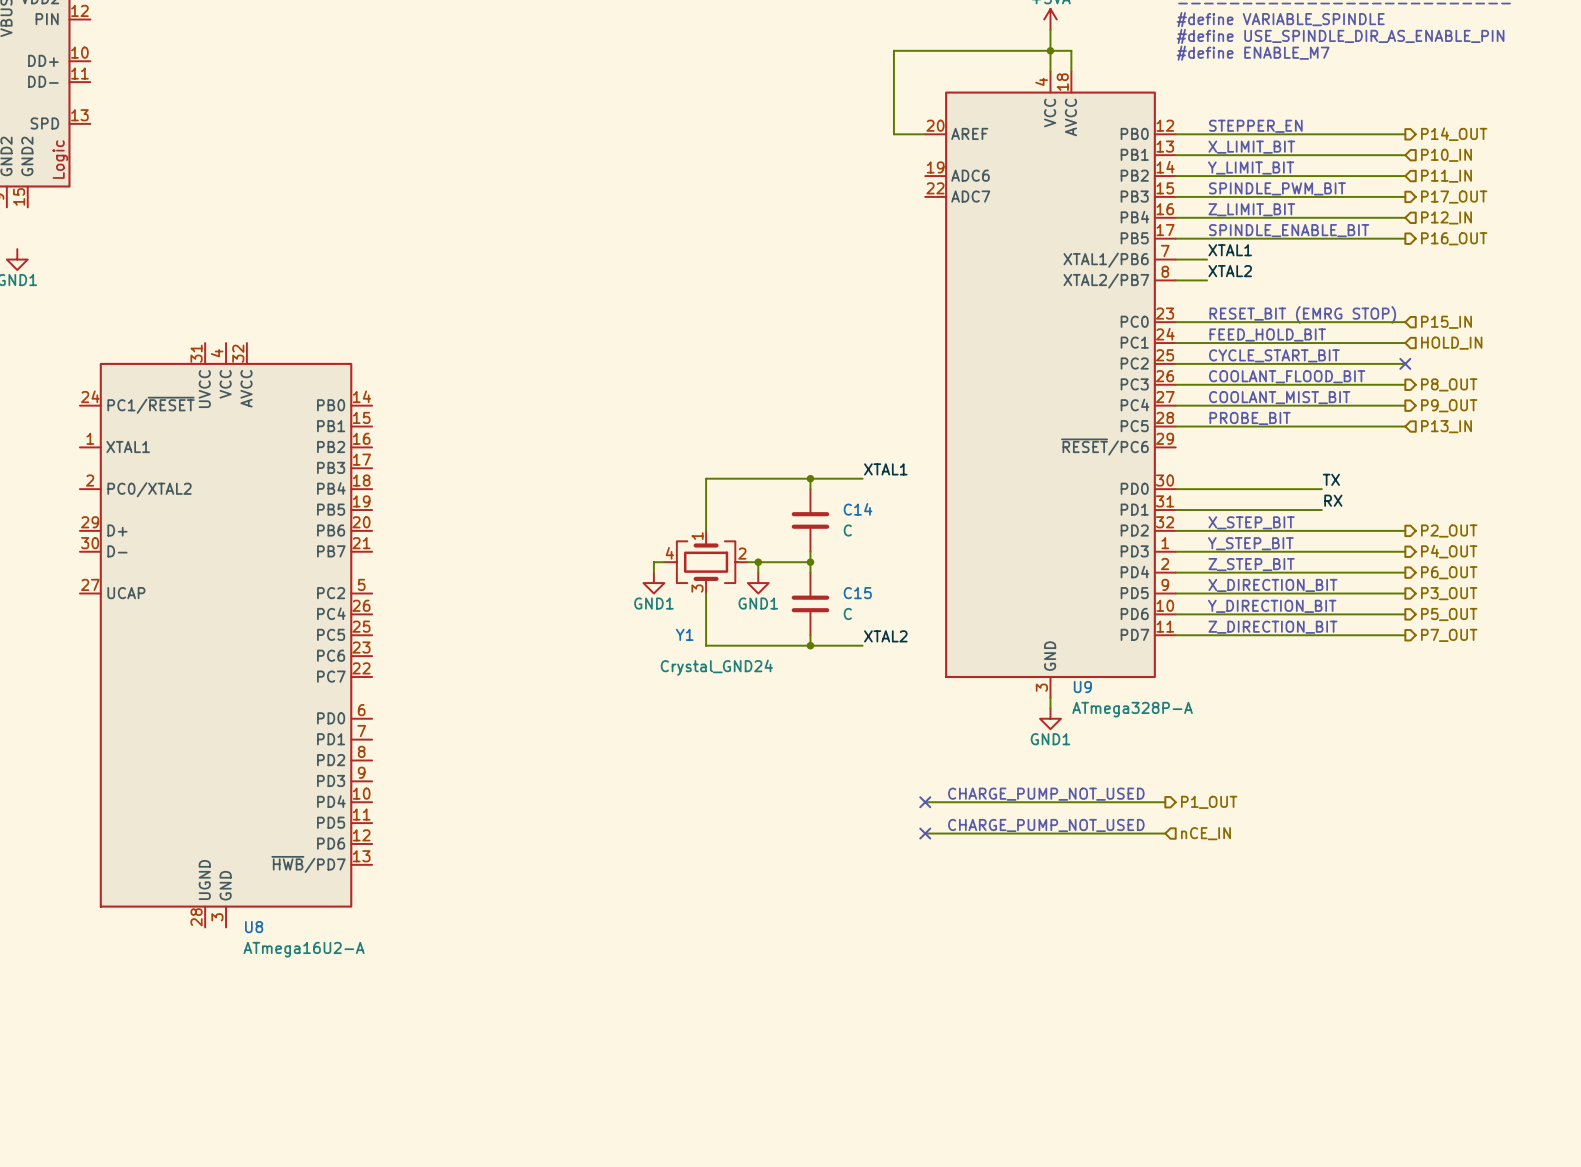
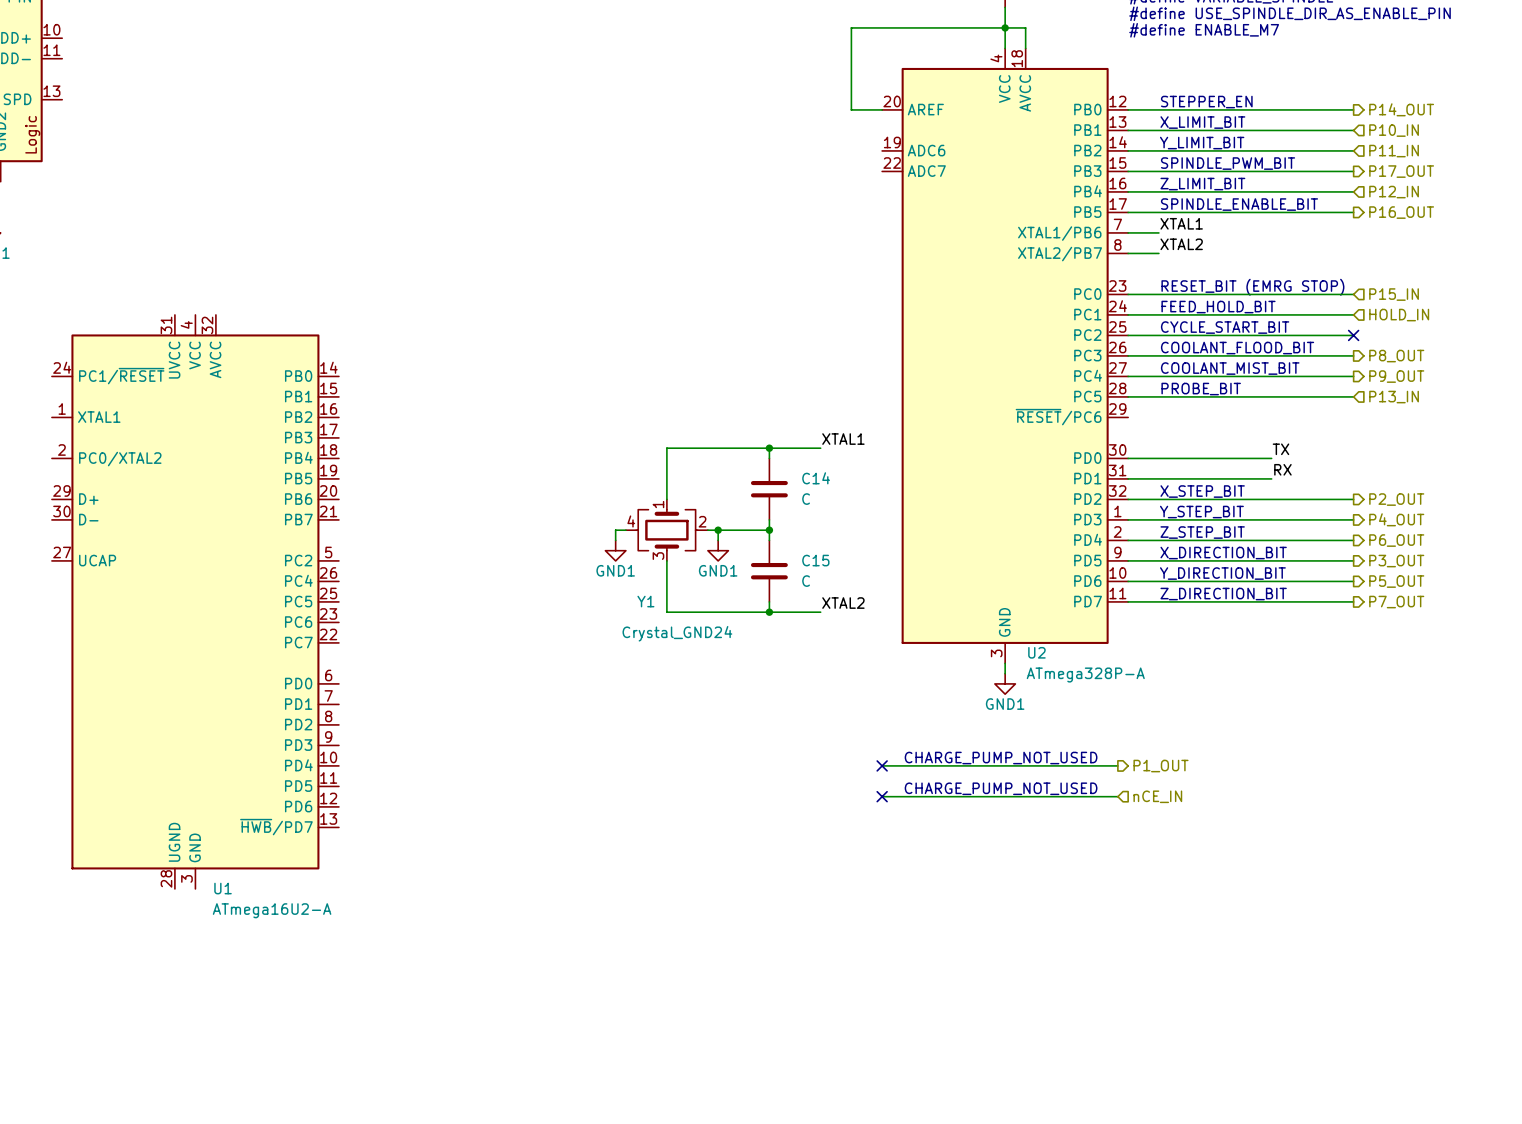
U9 name: U9 (1082, 687) -> U2 (1036, 652)
U8 name: U8 (254, 927) -> U1 (223, 888)

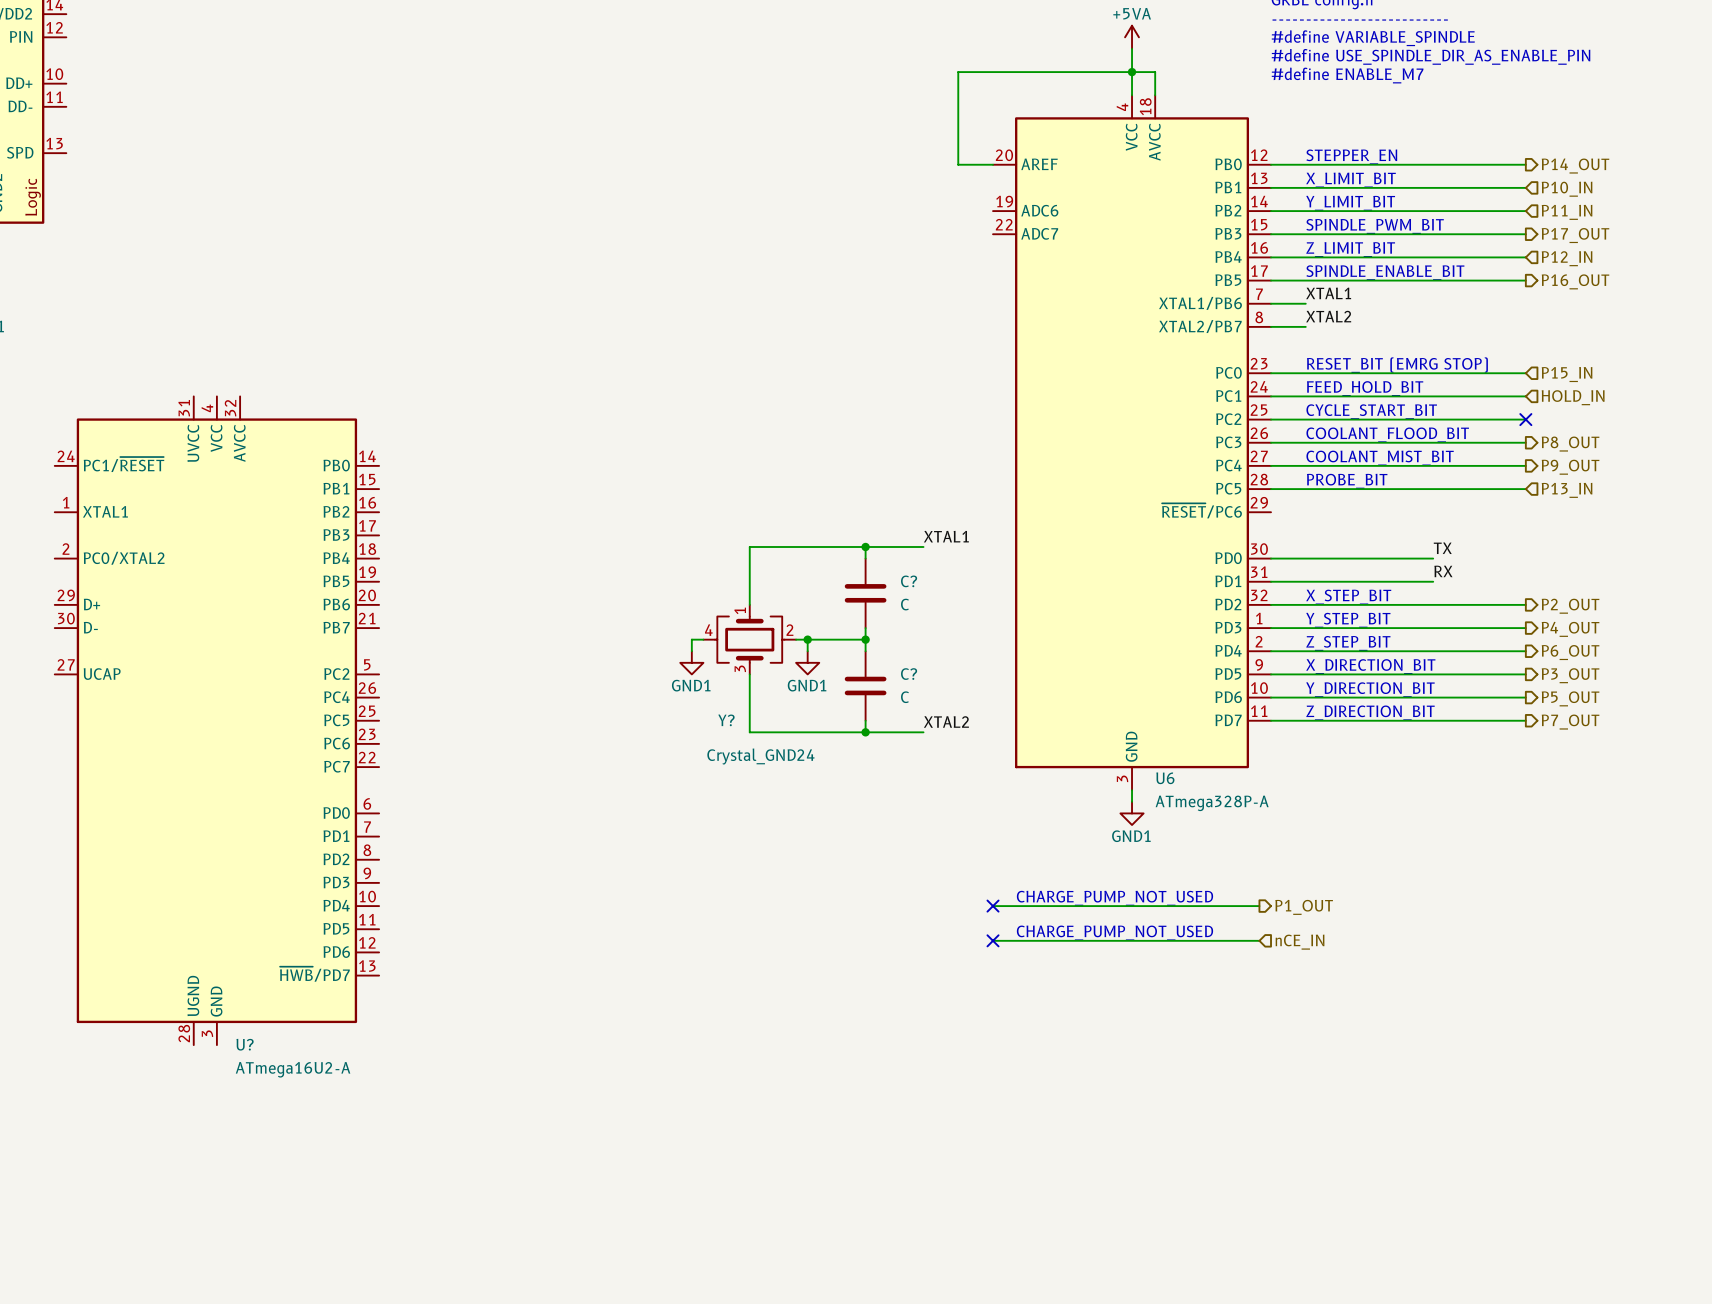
C14 name: C14 (816, 478) -> C? (909, 581)
C15 name: C15 (815, 560) -> C? (909, 674)
Y1 name: Y1 (645, 601) -> Y? (726, 720)
U2 name: U2 (1036, 652) -> U6 (1165, 778)
U1 name: U1 (223, 888) -> U? (245, 1044)

